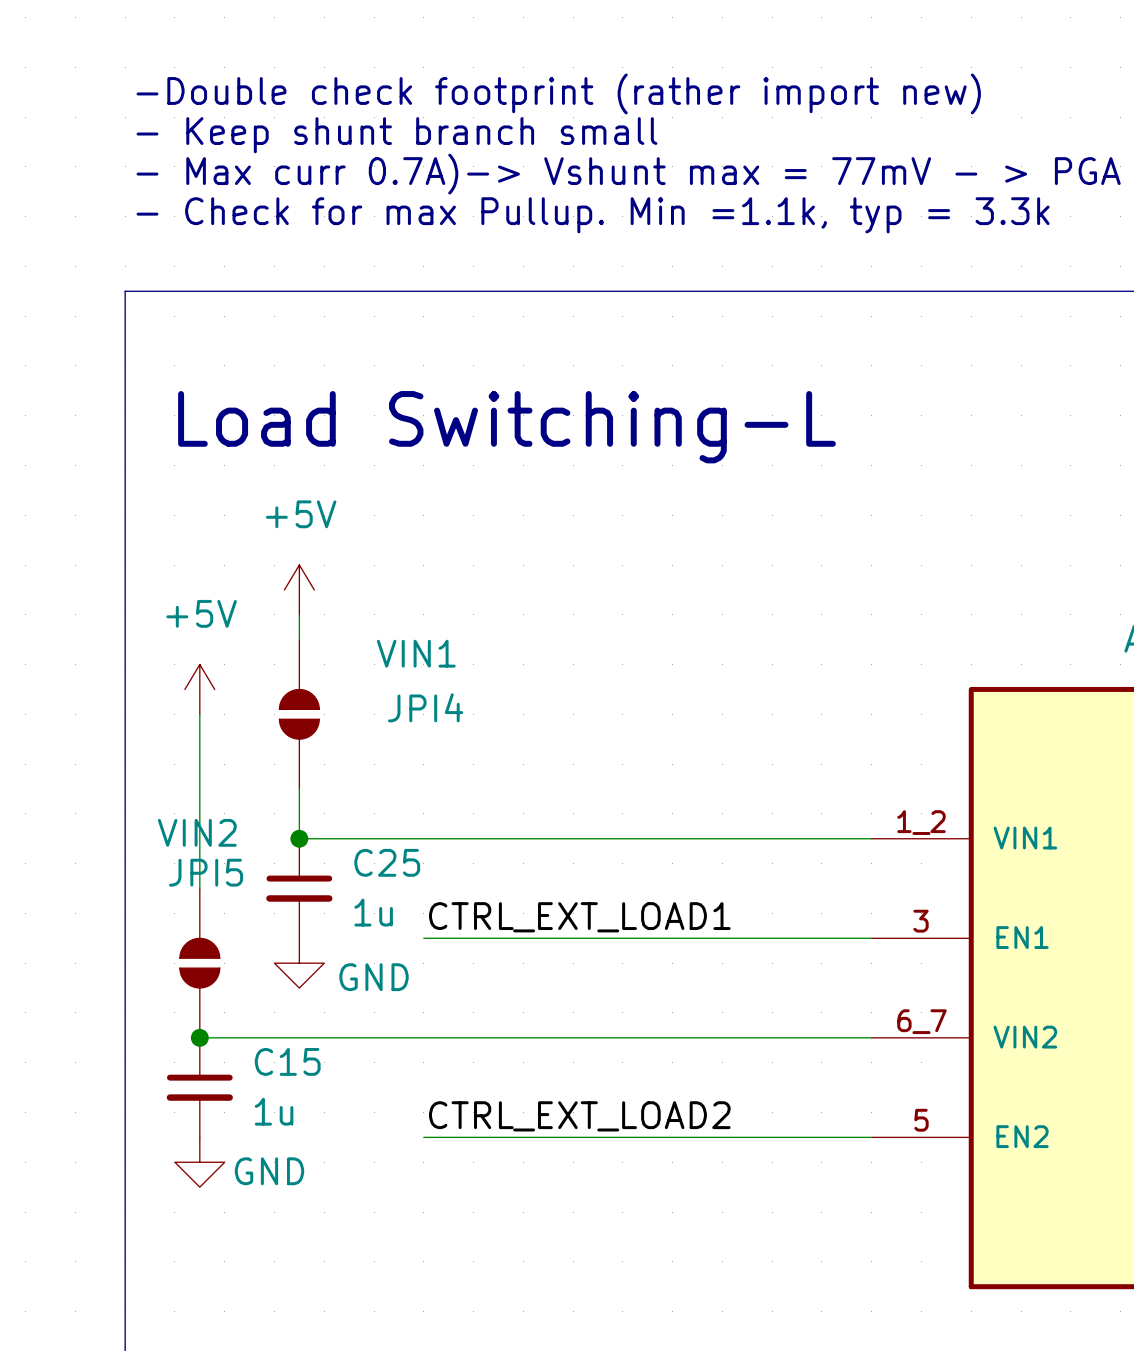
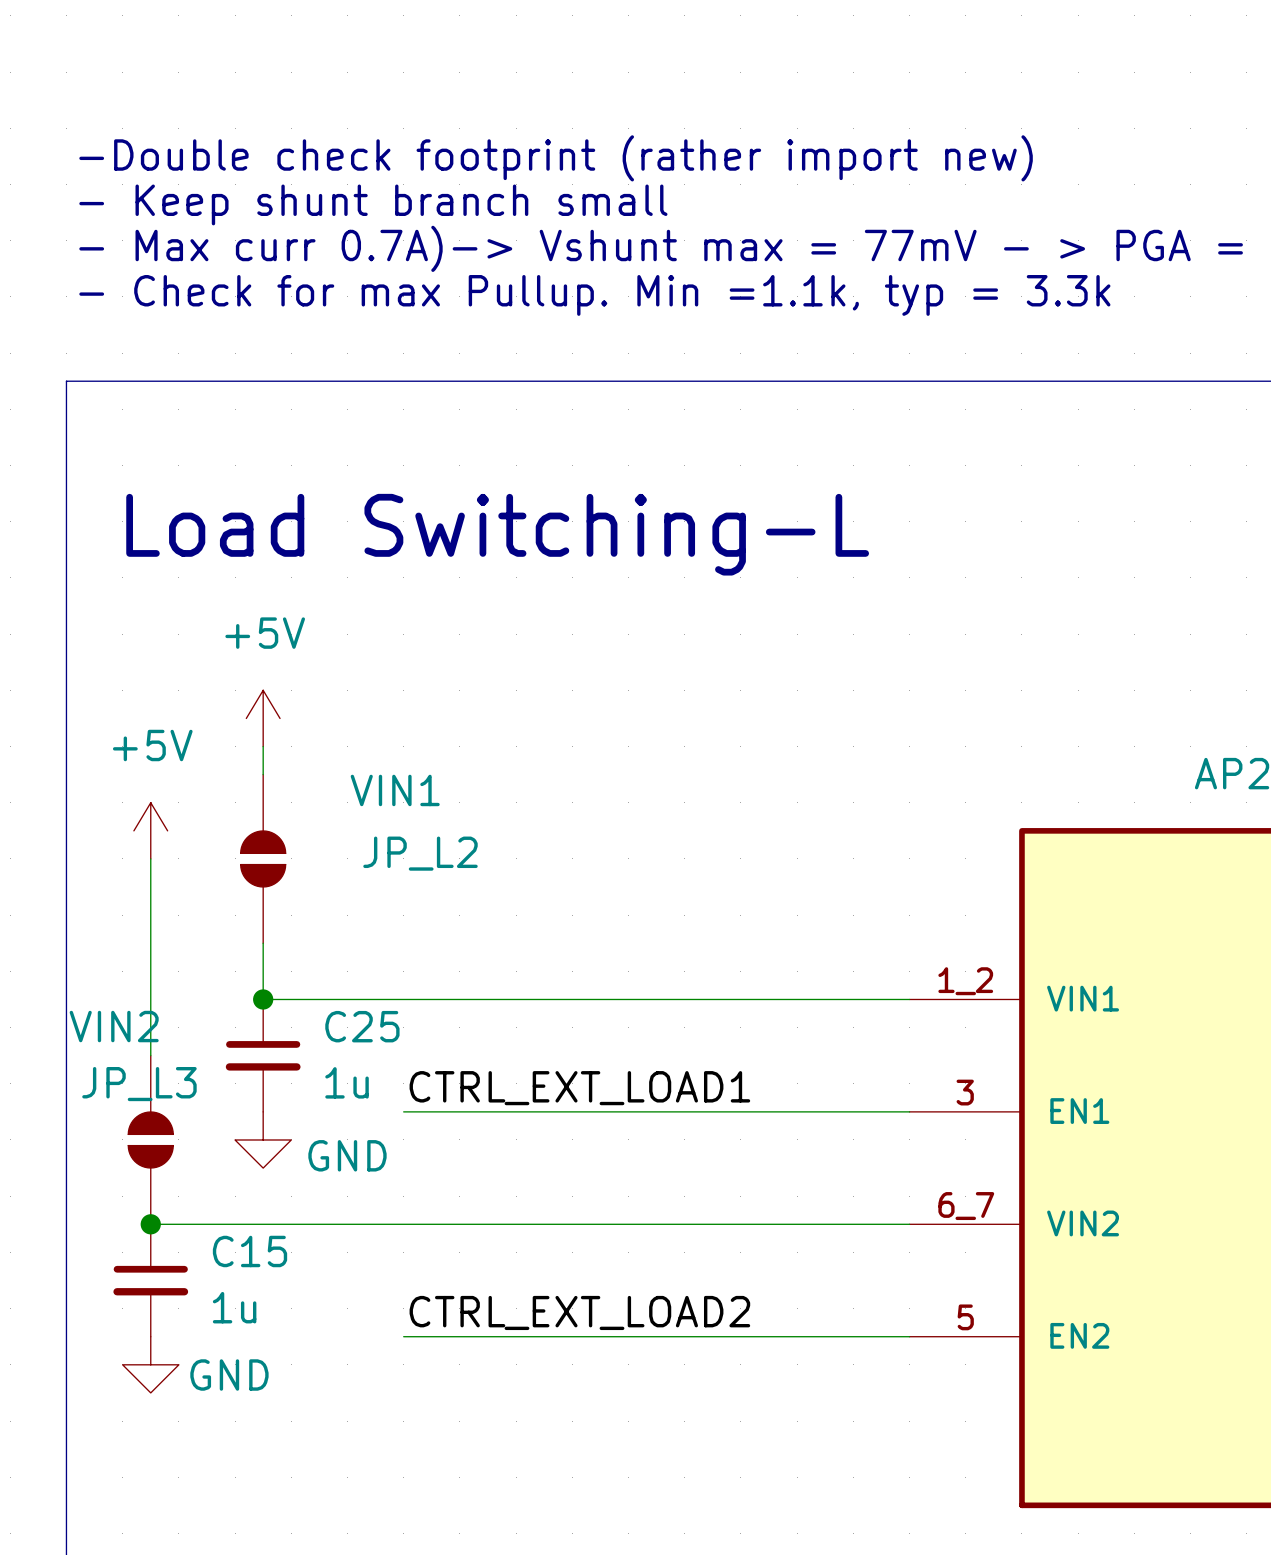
JPI4 name: JPI4 (425, 707) -> JP_L2 (420, 853)
JPI5 value position: VIN2 (197, 832) -> VIN2 (114, 1026)
JPI5 name: JPI5 (206, 872) -> JP_L3 (139, 1084)

